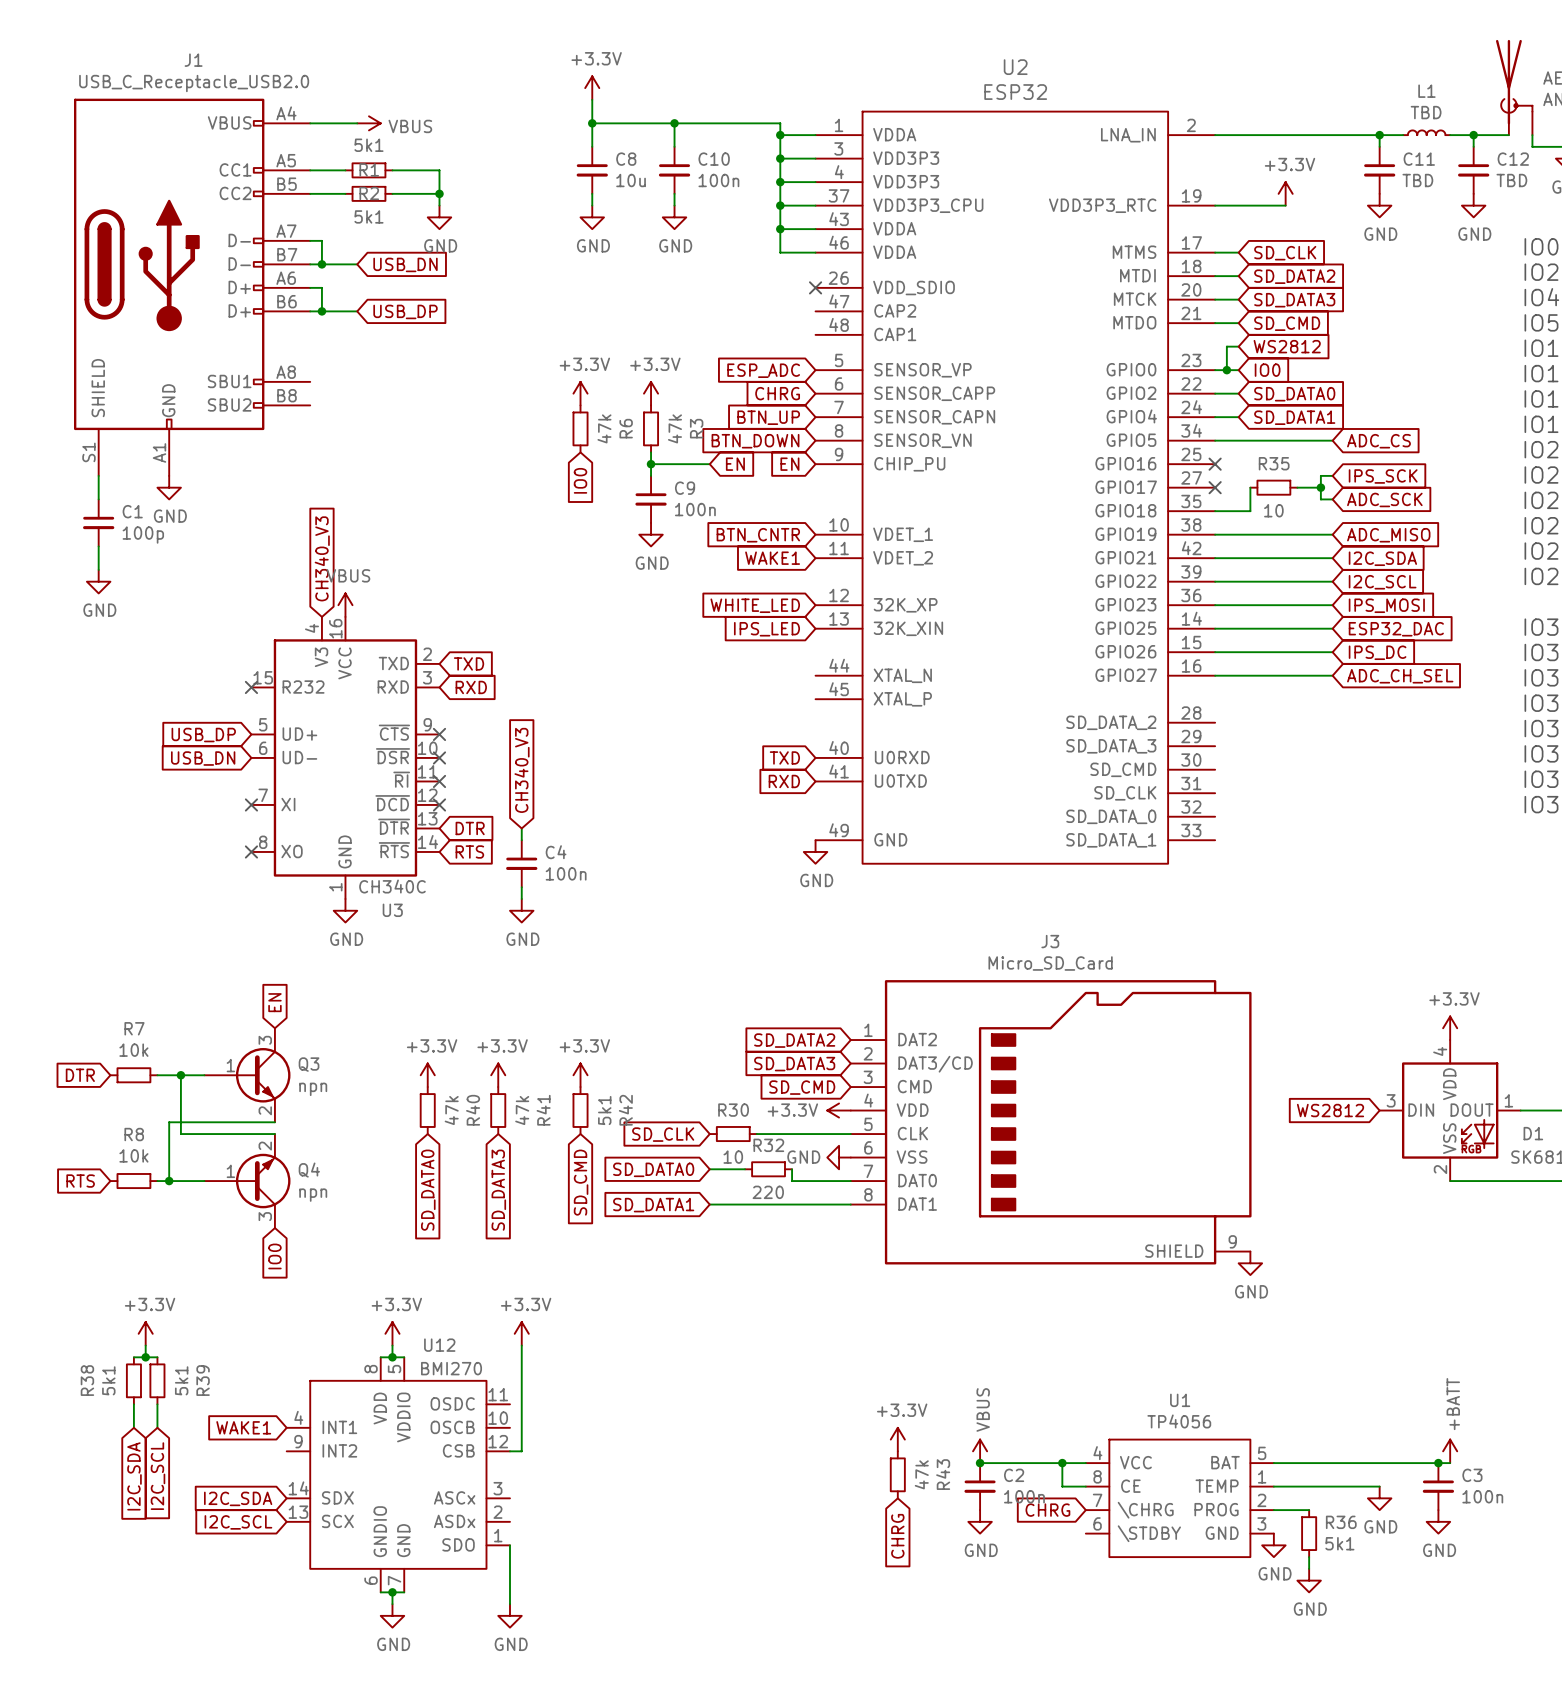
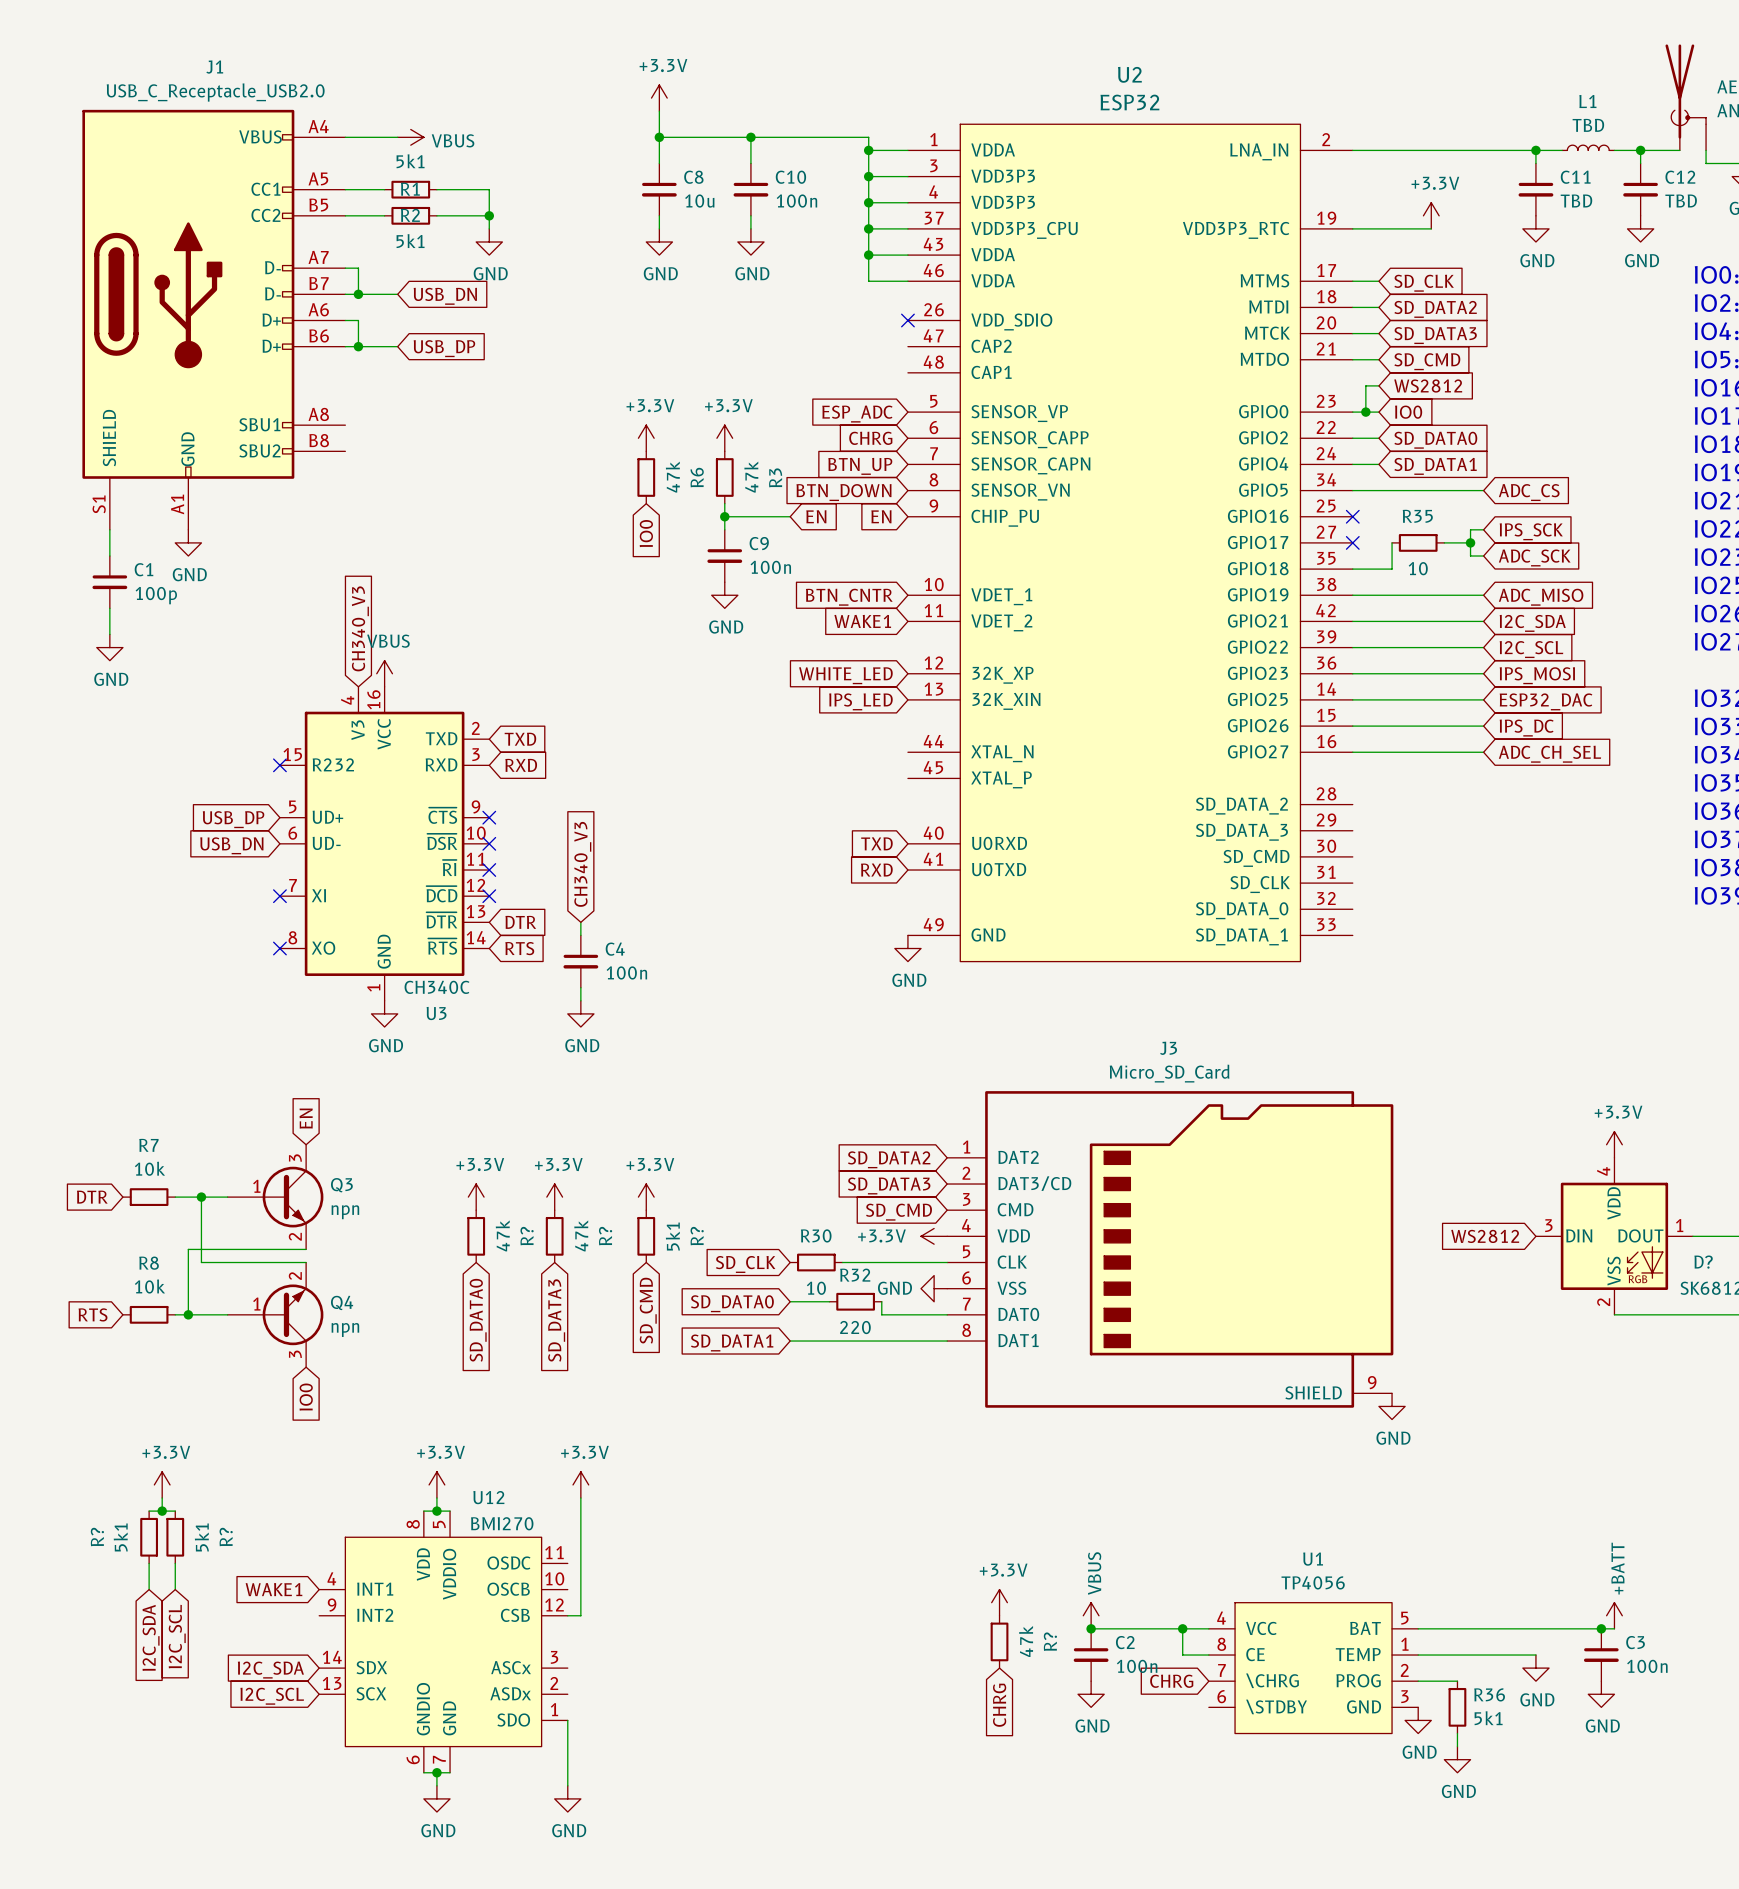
R40 name: R40 (473, 1110) -> R? (527, 1236)
R41 name: R41 (543, 1110) -> R? (605, 1236)
R42 name: R42 (625, 1110) -> R? (697, 1236)
D1 name: D1 (1533, 1133) -> D? (1703, 1262)
R38 name: R38 (87, 1380) -> R? (97, 1537)
R39 name: R39 (203, 1380) -> R? (226, 1537)
R43 name: R43 (943, 1474) -> R? (1050, 1641)

